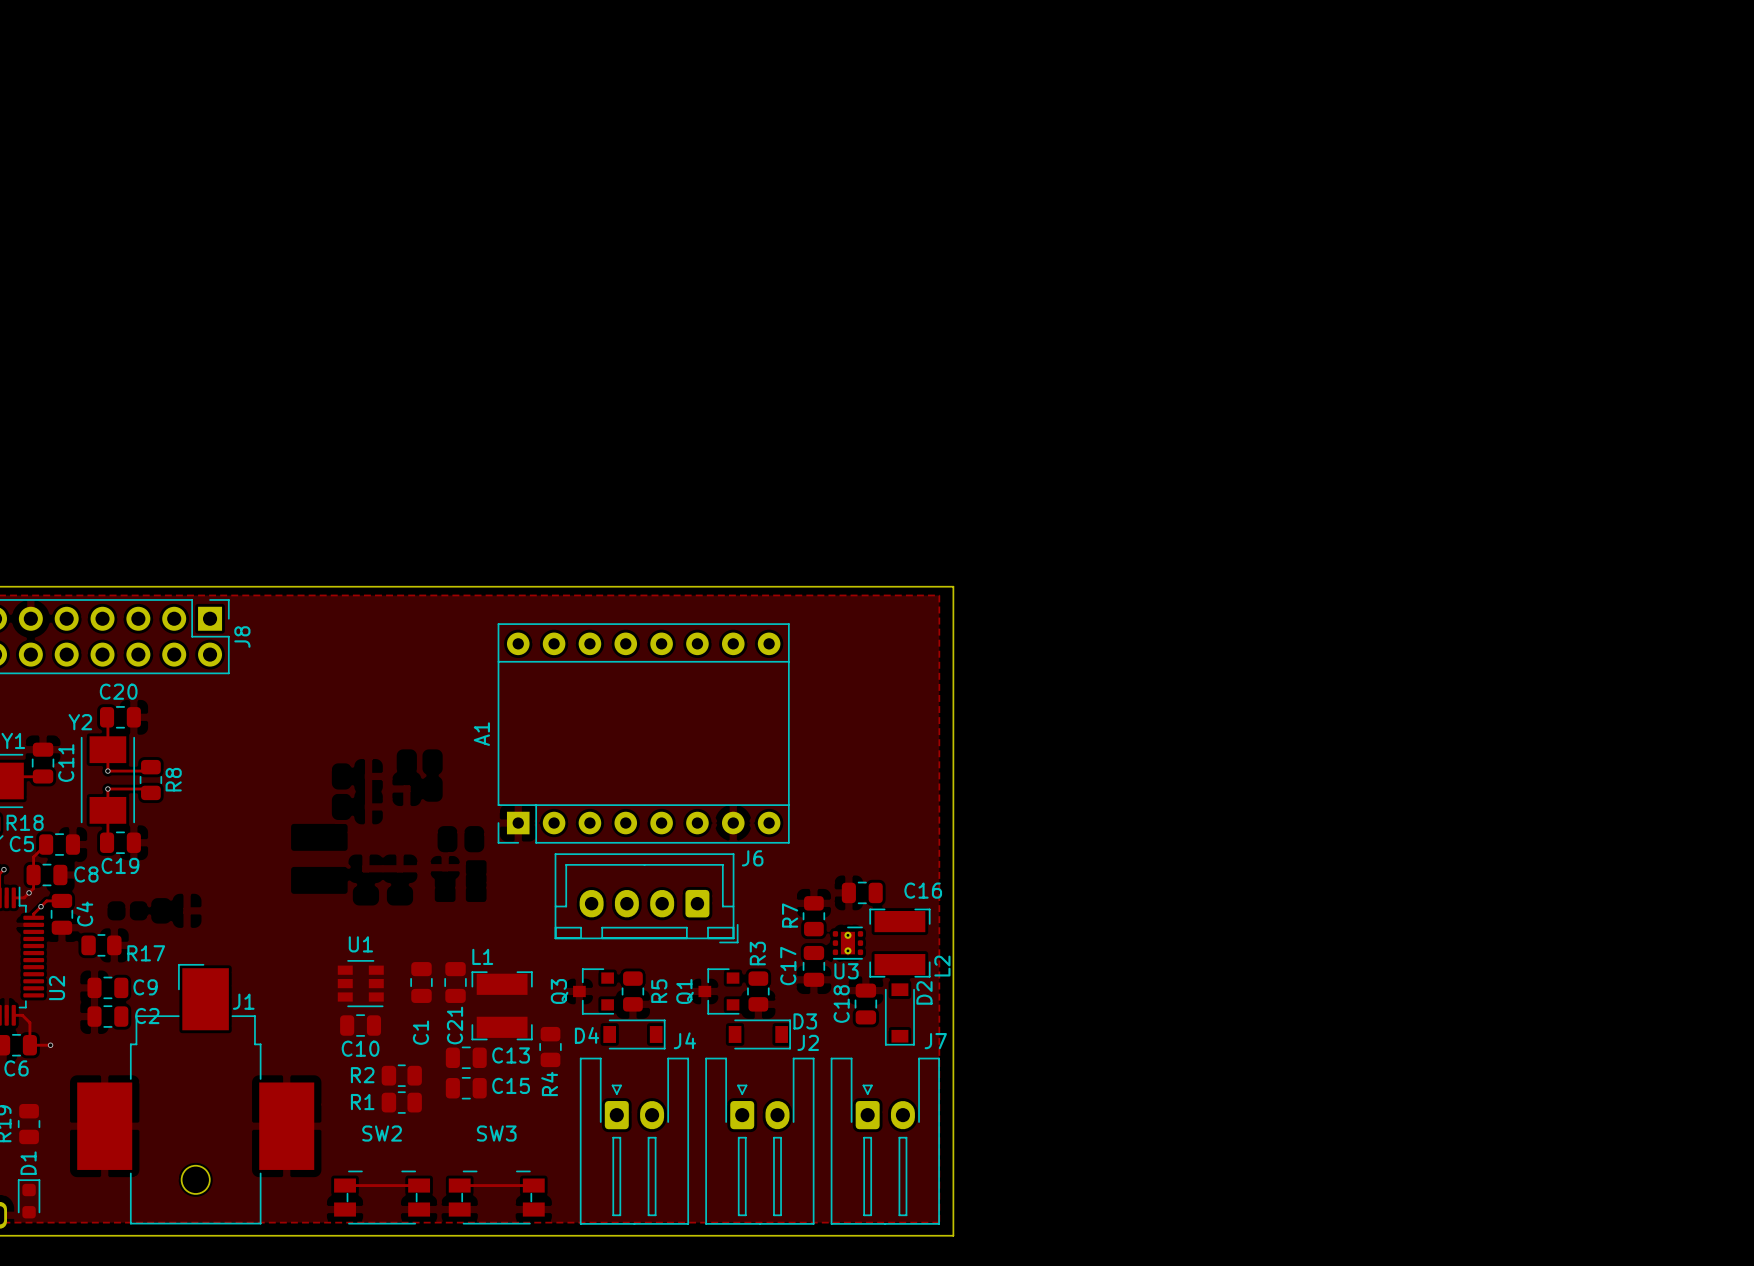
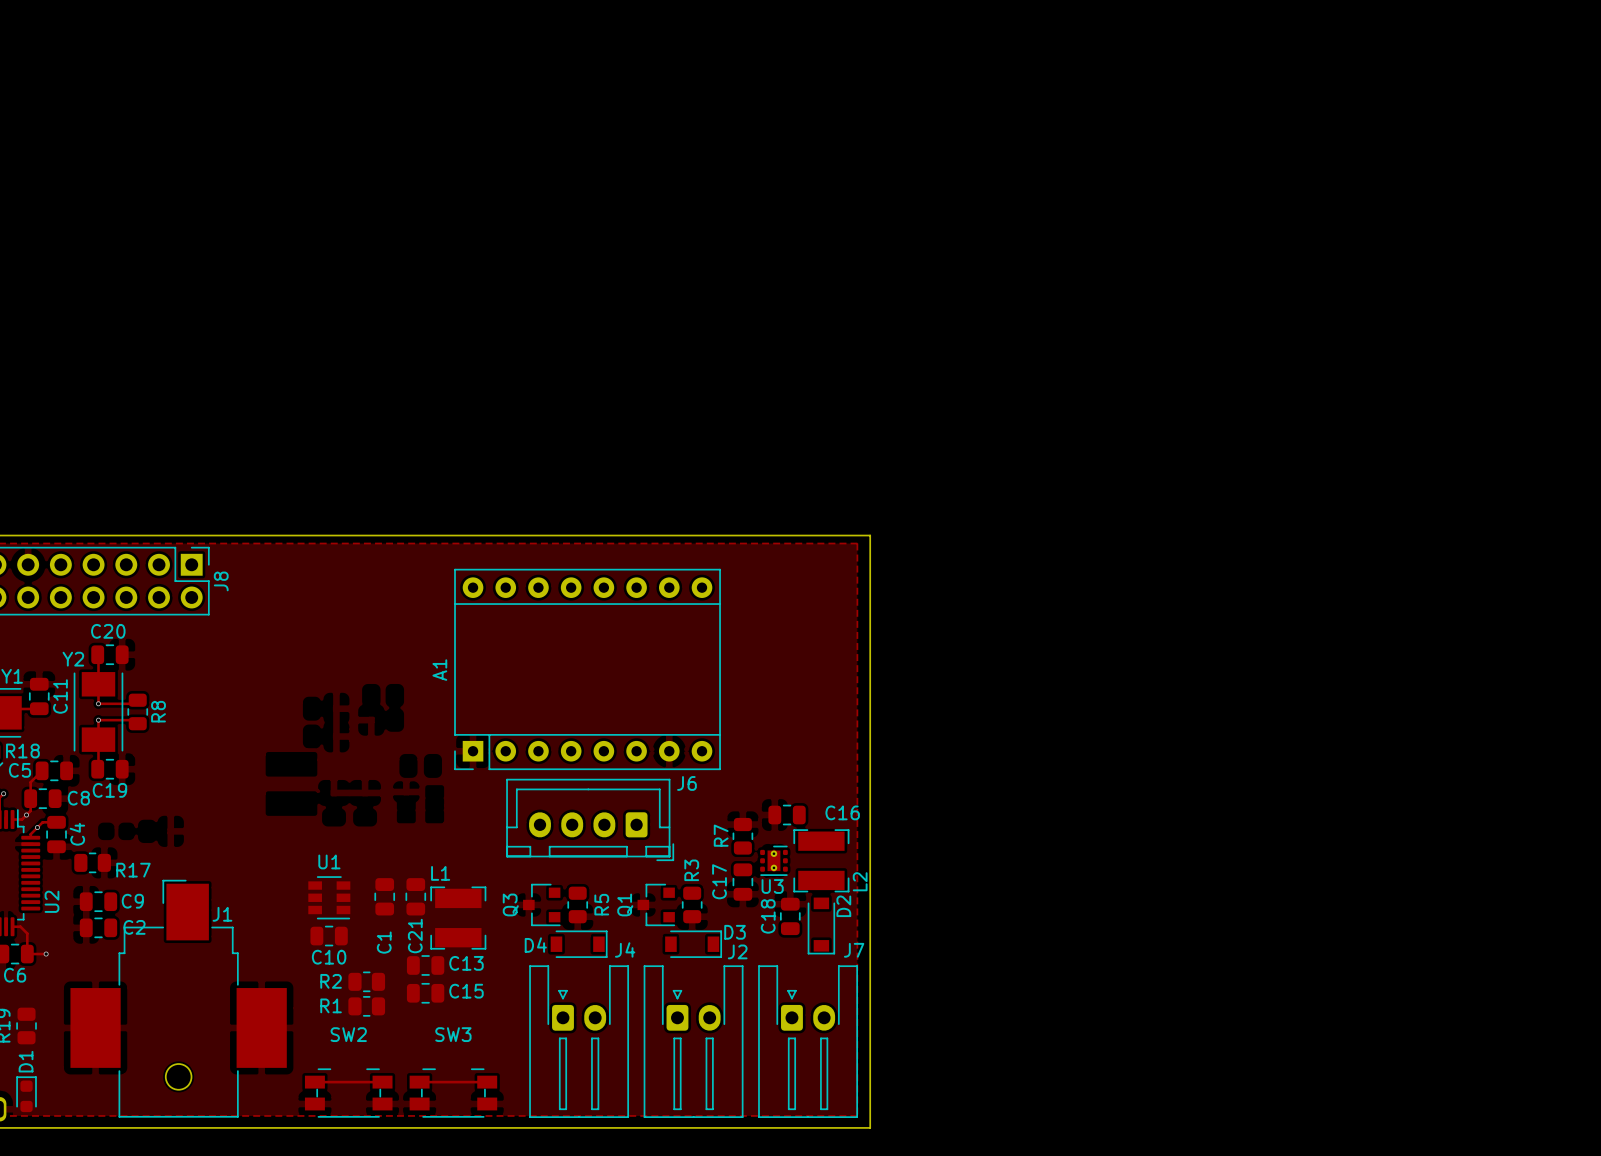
R4: (550, 1047) -> none

